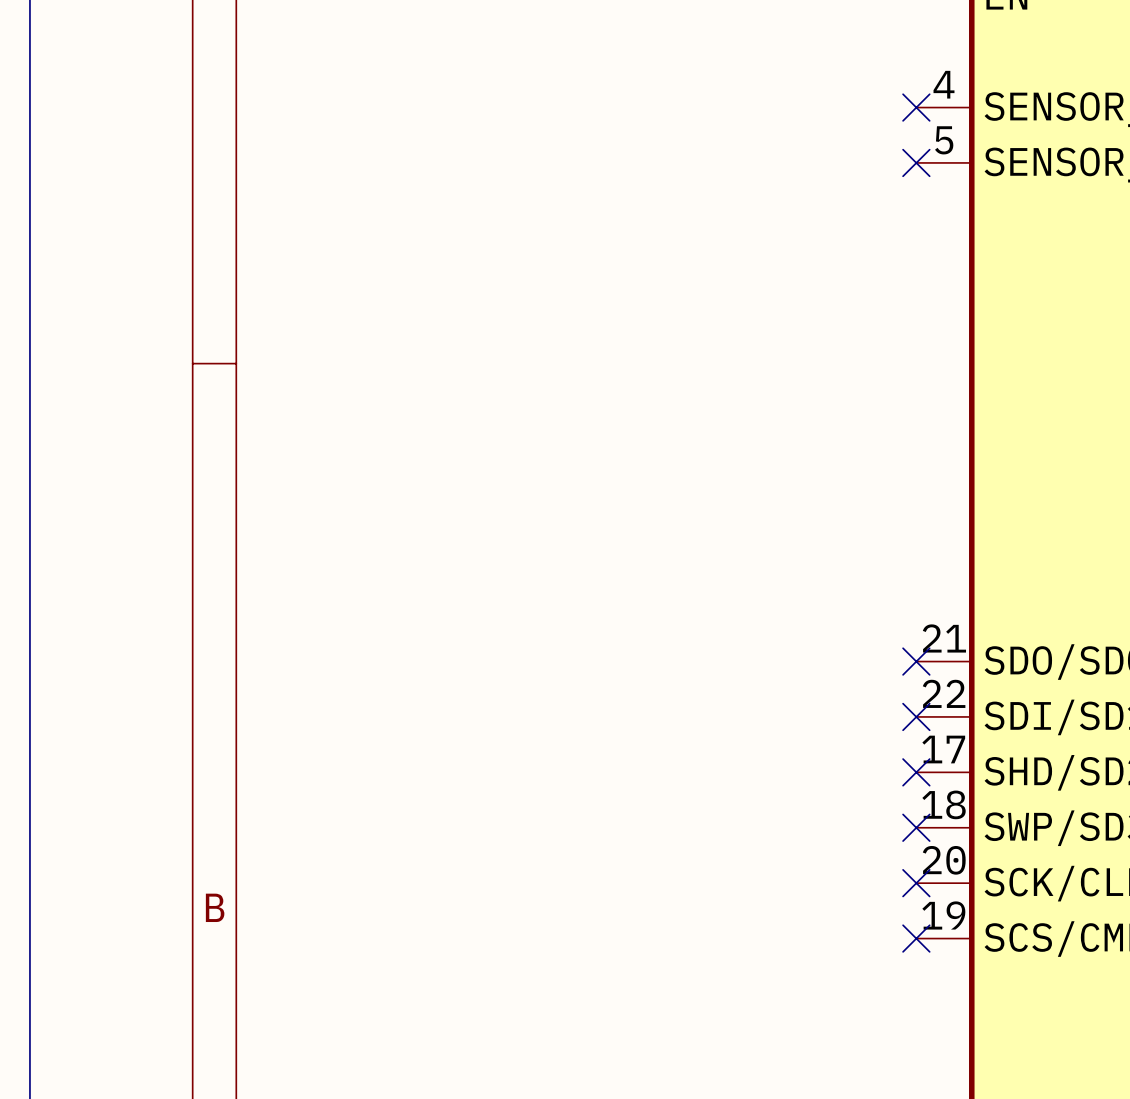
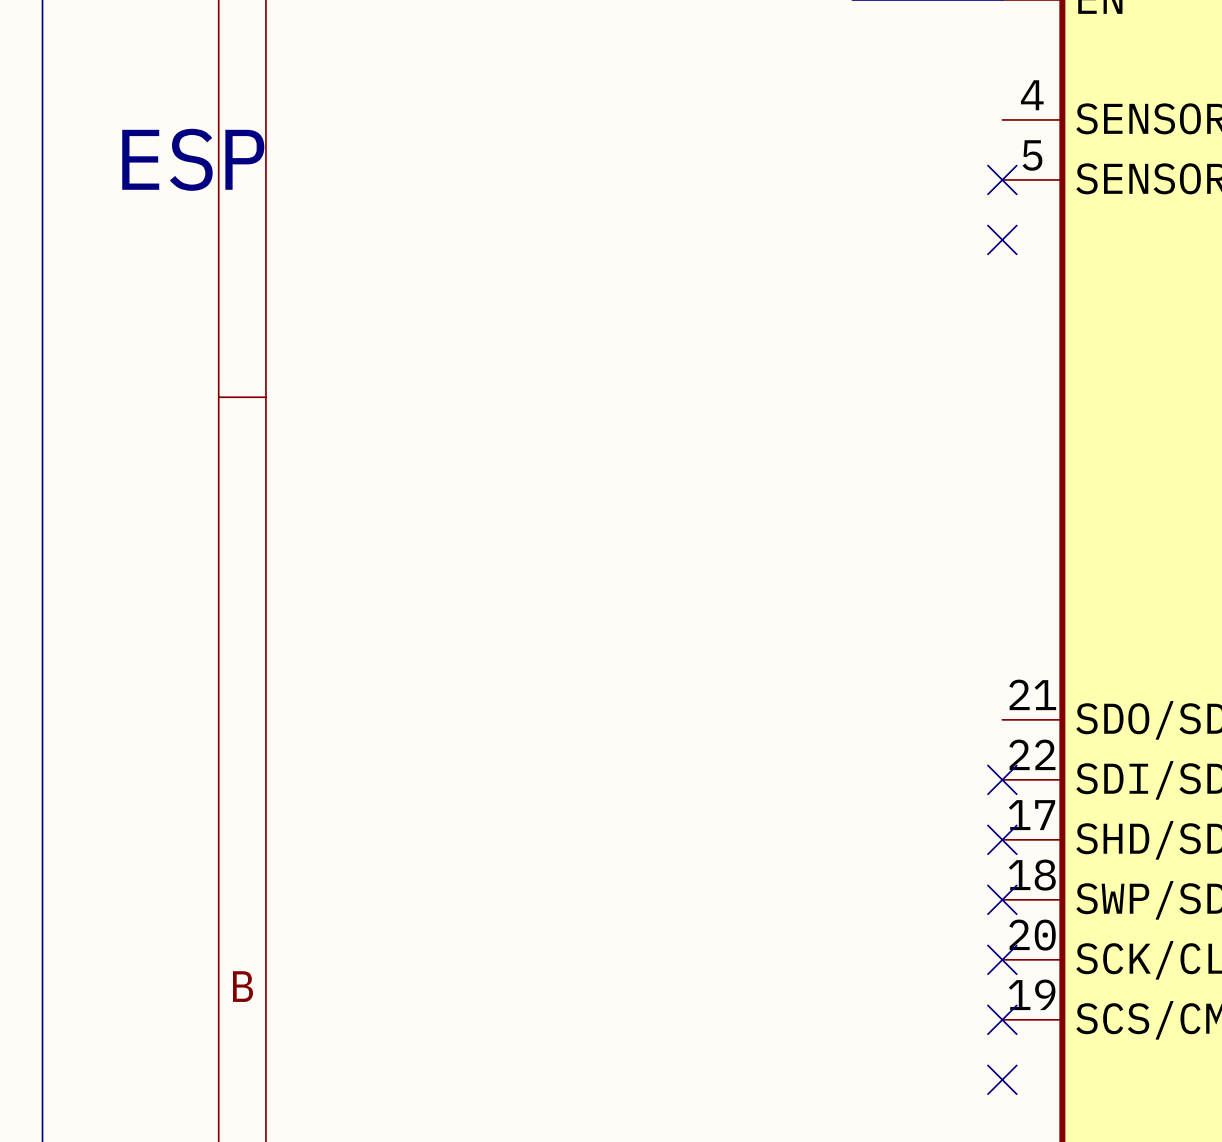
no-connect mark position: (916, 107) -> (1002, 239)
text: none -> ESP (193, 159)
no-connect mark: (916, 661) -> none
no-connect mark: none -> (1002, 1079)

